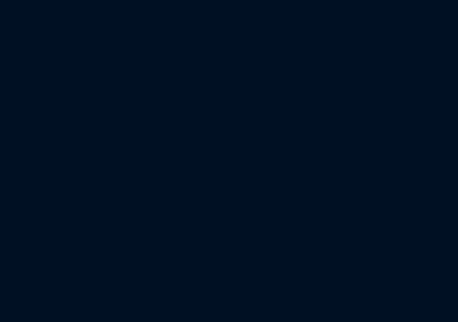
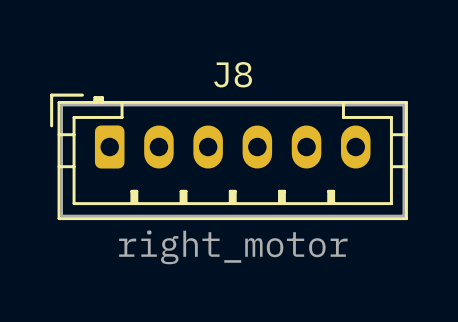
J8: none -> right_motor (229, 156)

